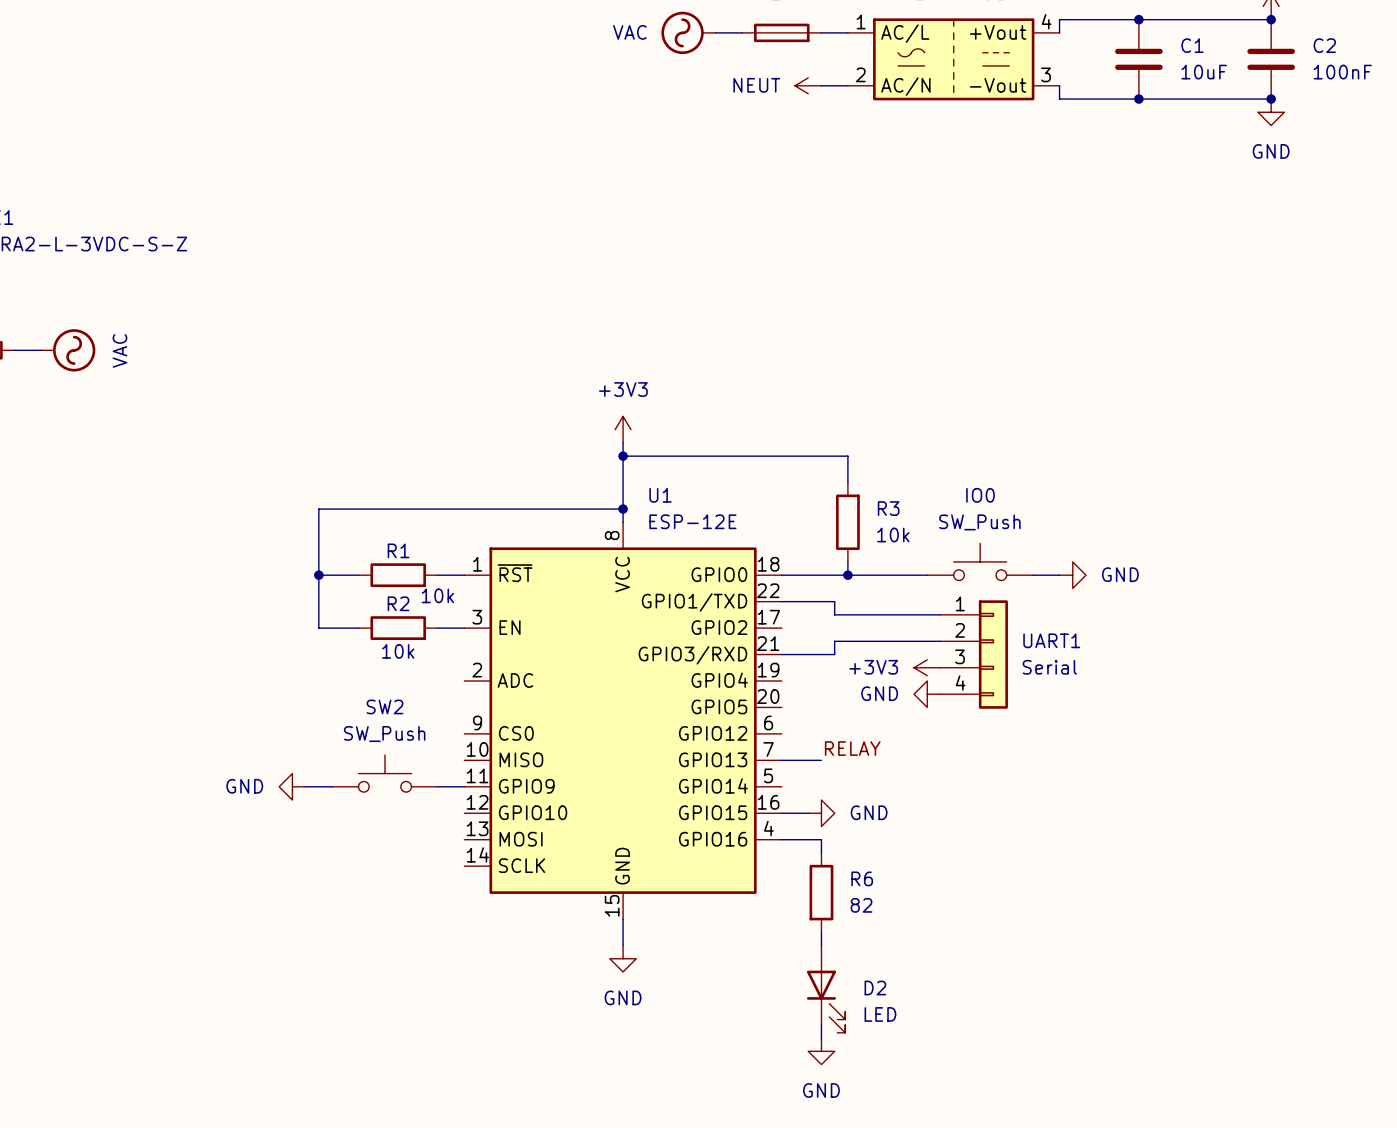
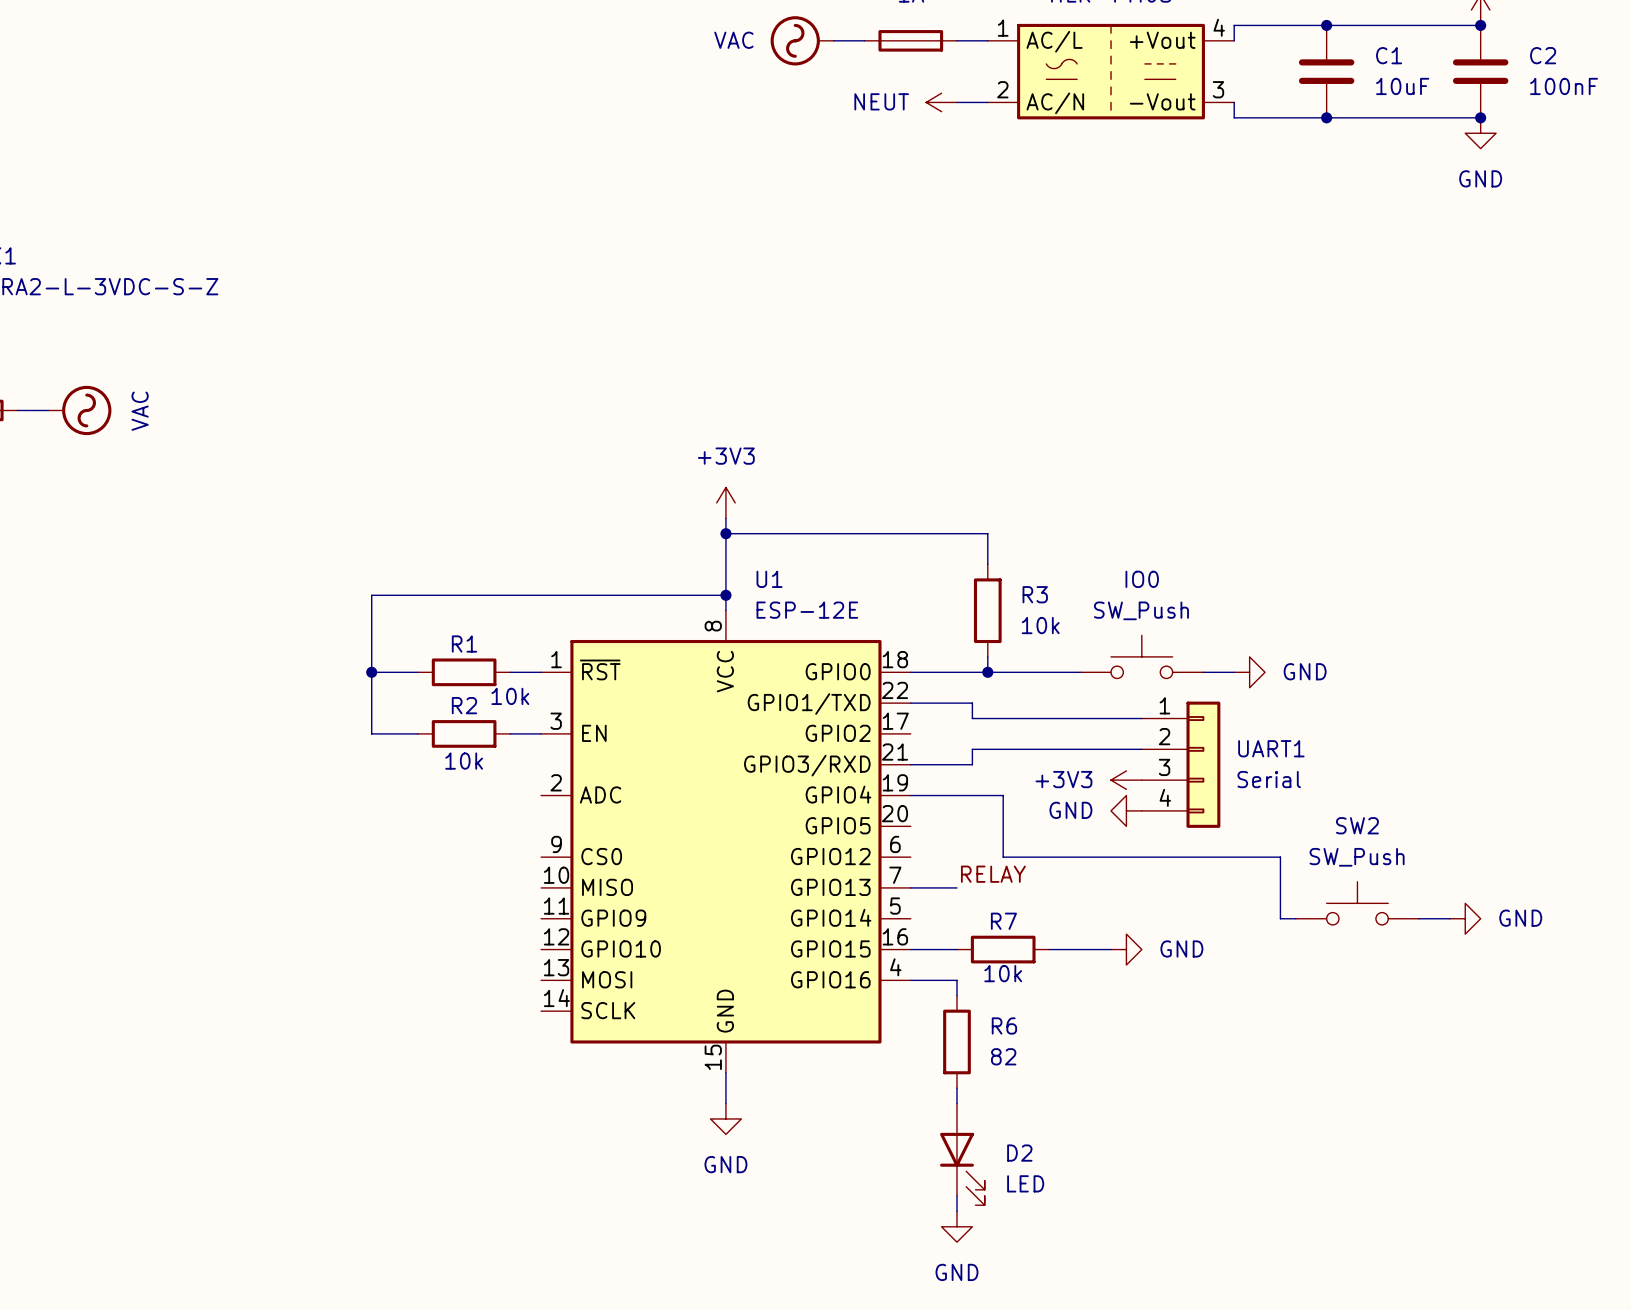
UART1 position: (974, 654) -> (1181, 764)
power symbol position: +3V3 (927, 667) -> +3V3 (1126, 780)
wire: none -> (910, 795) (1003, 795) (1003, 857) (1280, 857) (1280, 918) (1295, 918)
power symbol position: GND (927, 694) -> GND (1126, 810)
SW2 position: (384, 773) -> (1357, 903)
power symbol: GND (292, 786) -> none
wire: (305, 786) (332, 786) -> none
wire: (437, 786) (464, 786) -> none
wire: none -> (1419, 918) (1449, 918)
power symbol: none -> GND (1465, 918)
power symbol: GND (821, 813) -> none
R7: none -> 10k (1003, 949)
wire: none -> (1049, 949) (1111, 949)
power symbol: none -> GND (1126, 949)

